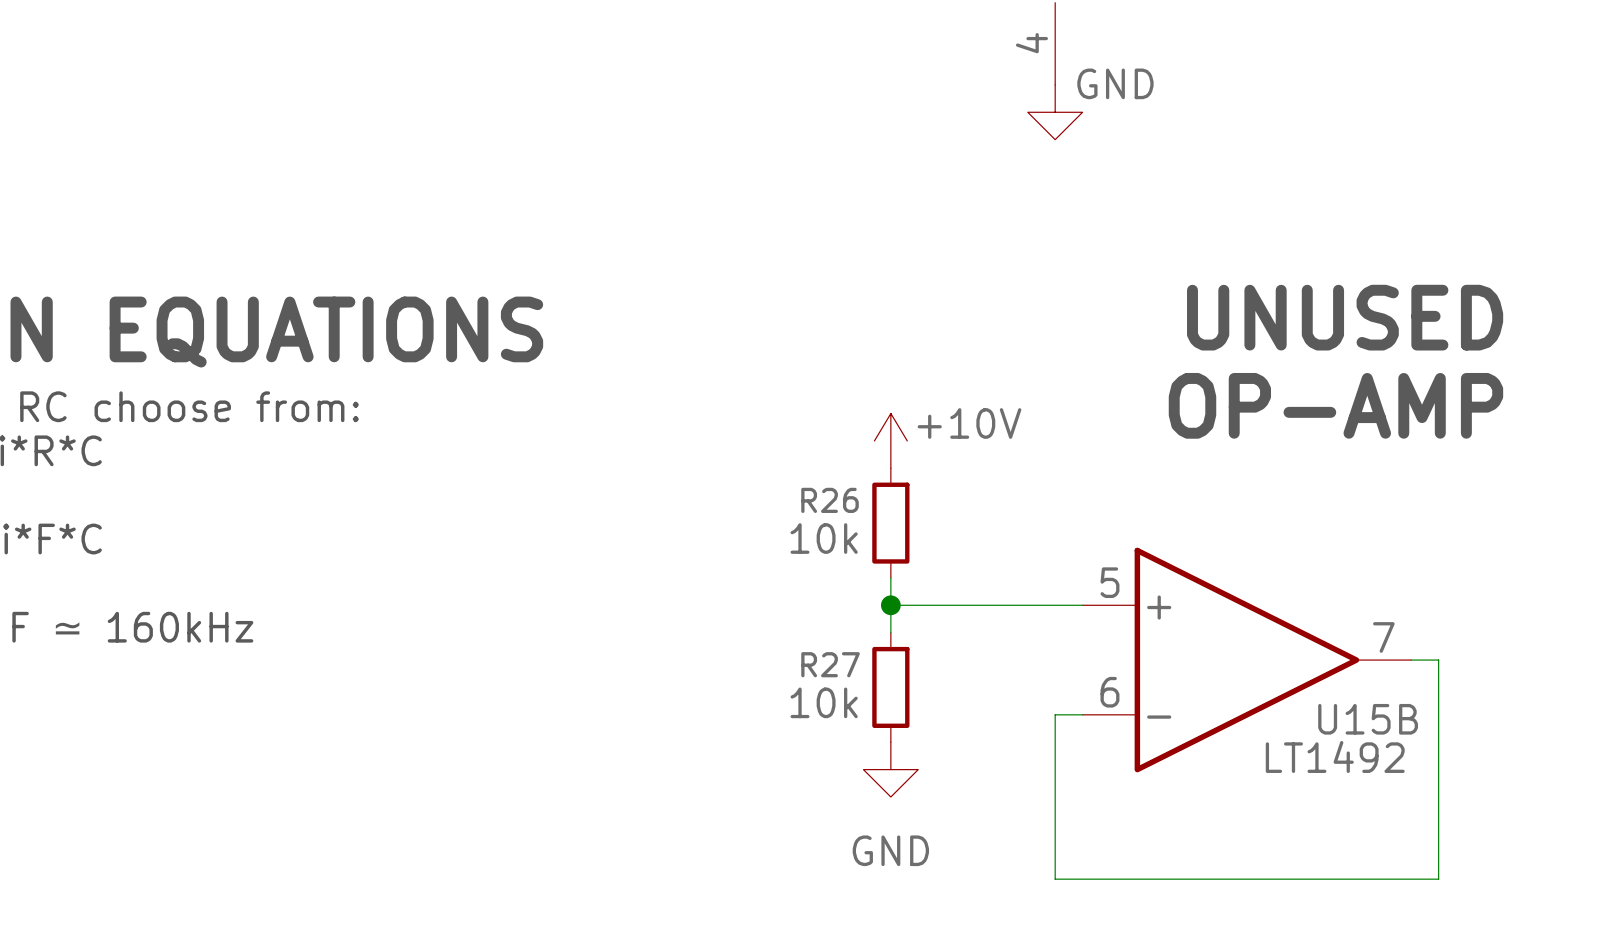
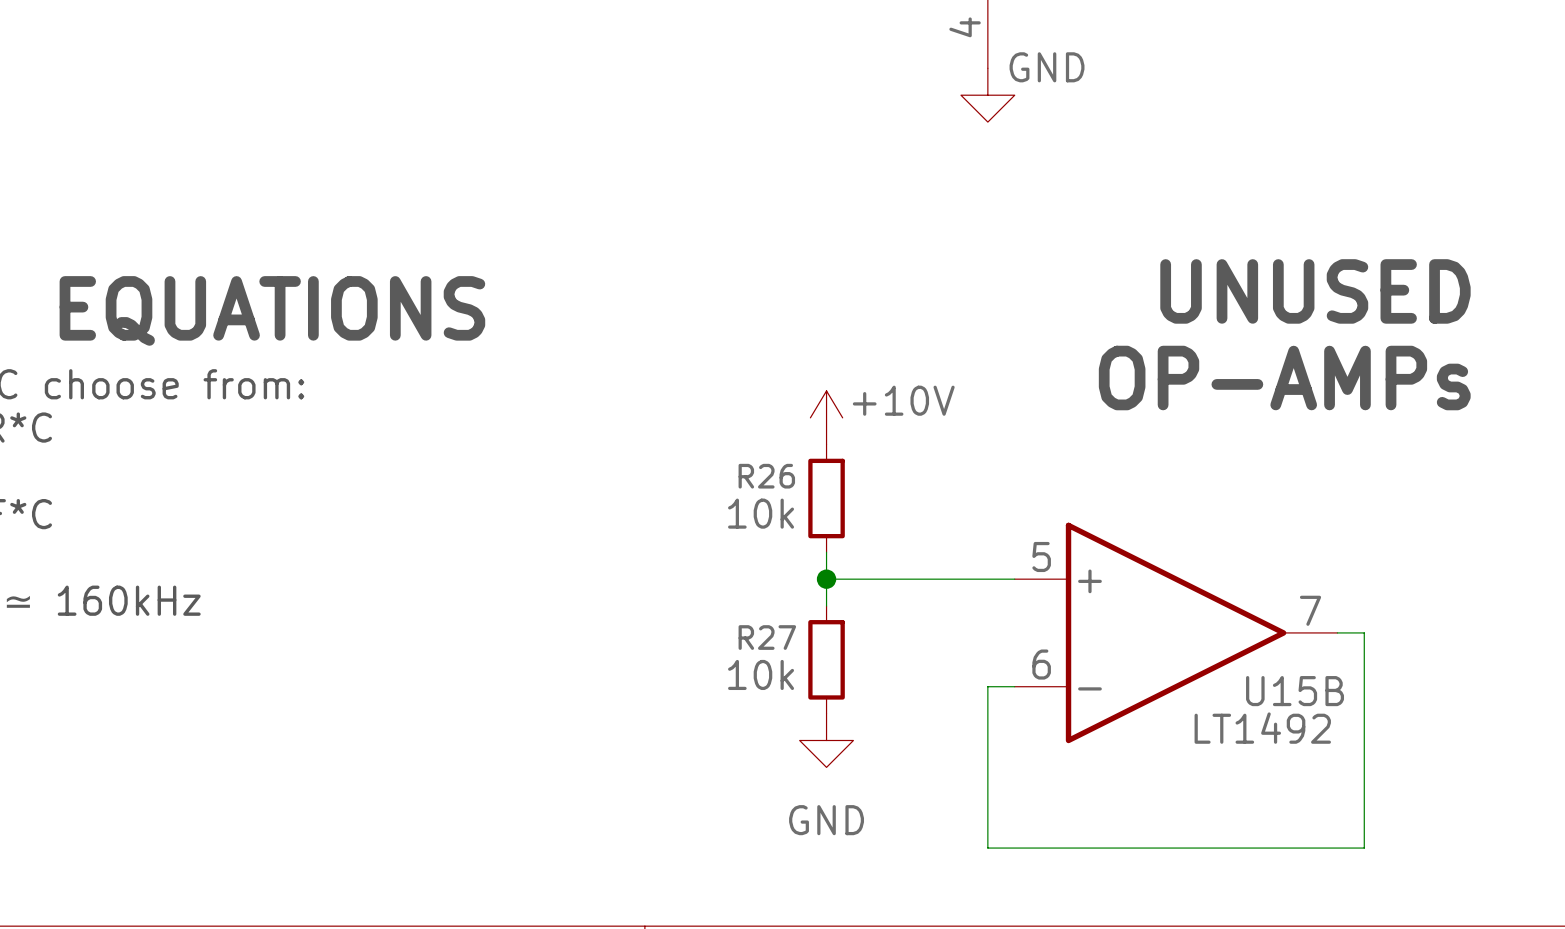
text position: UNUSED (1345, 317) -> UNUSED (1315, 291)
text: OP-AMP (1335, 405) -> OP-AMPs (1284, 378)

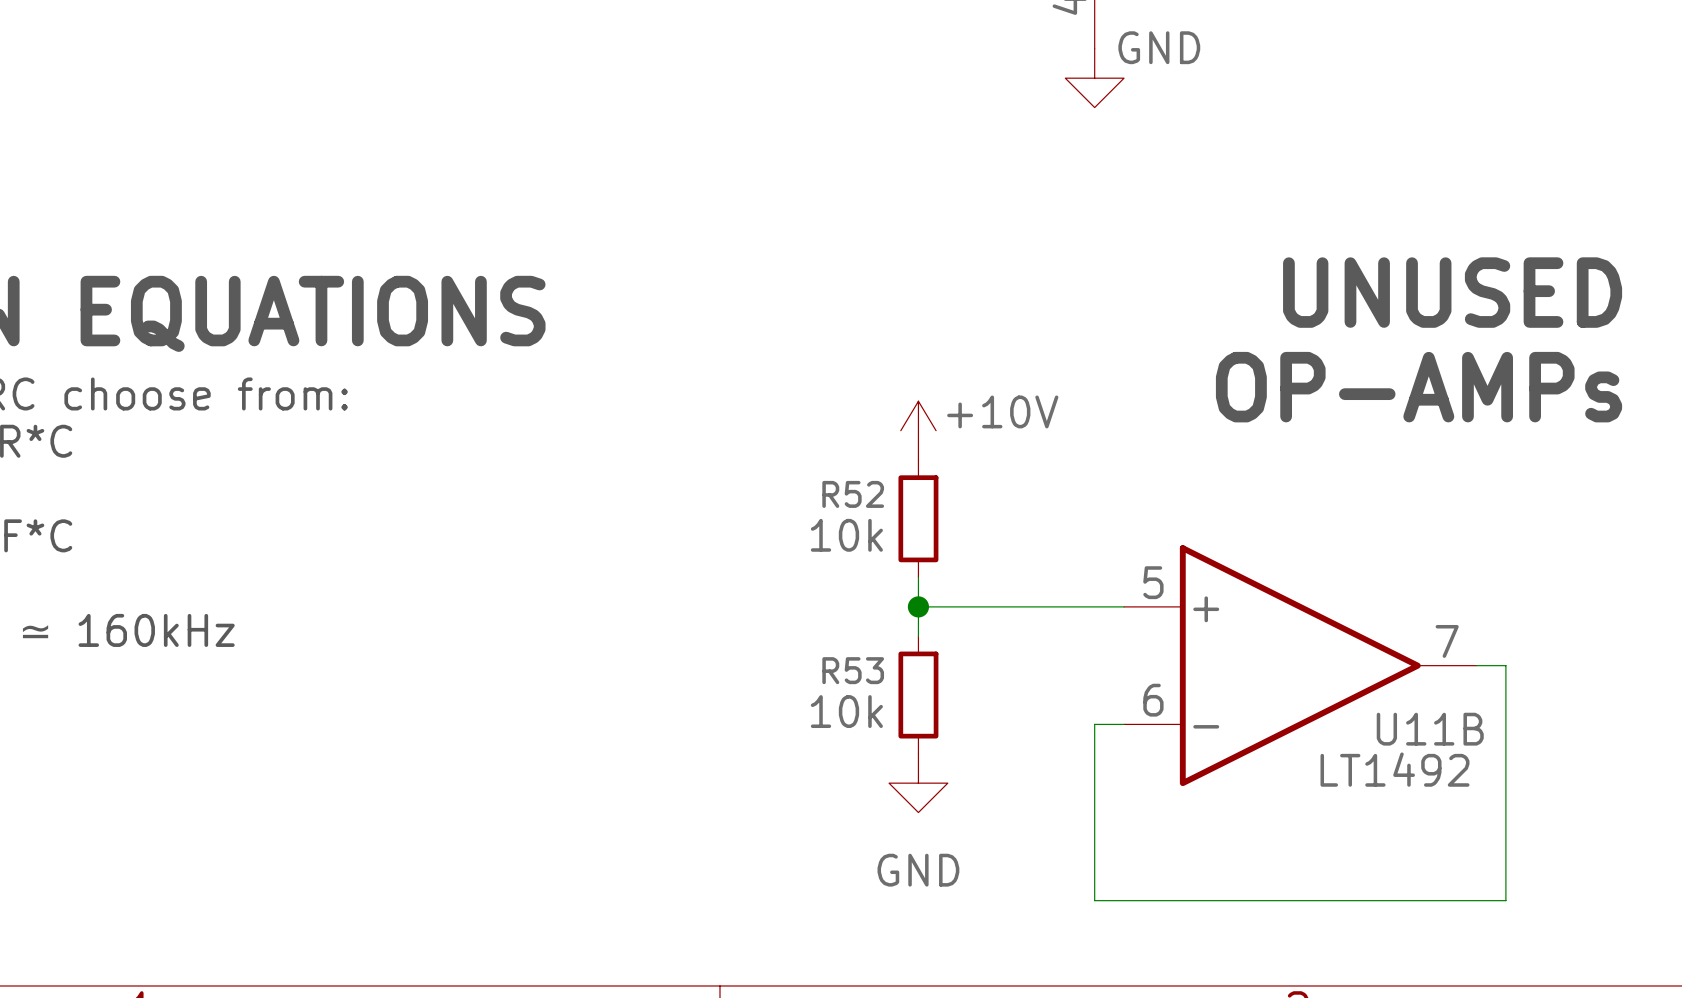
R26 name: R26 (766, 476) -> R52 (853, 494)
R27 name: R27 (767, 637) -> R53 (853, 670)
U15B name: U15B (1295, 691) -> U11B (1430, 729)

